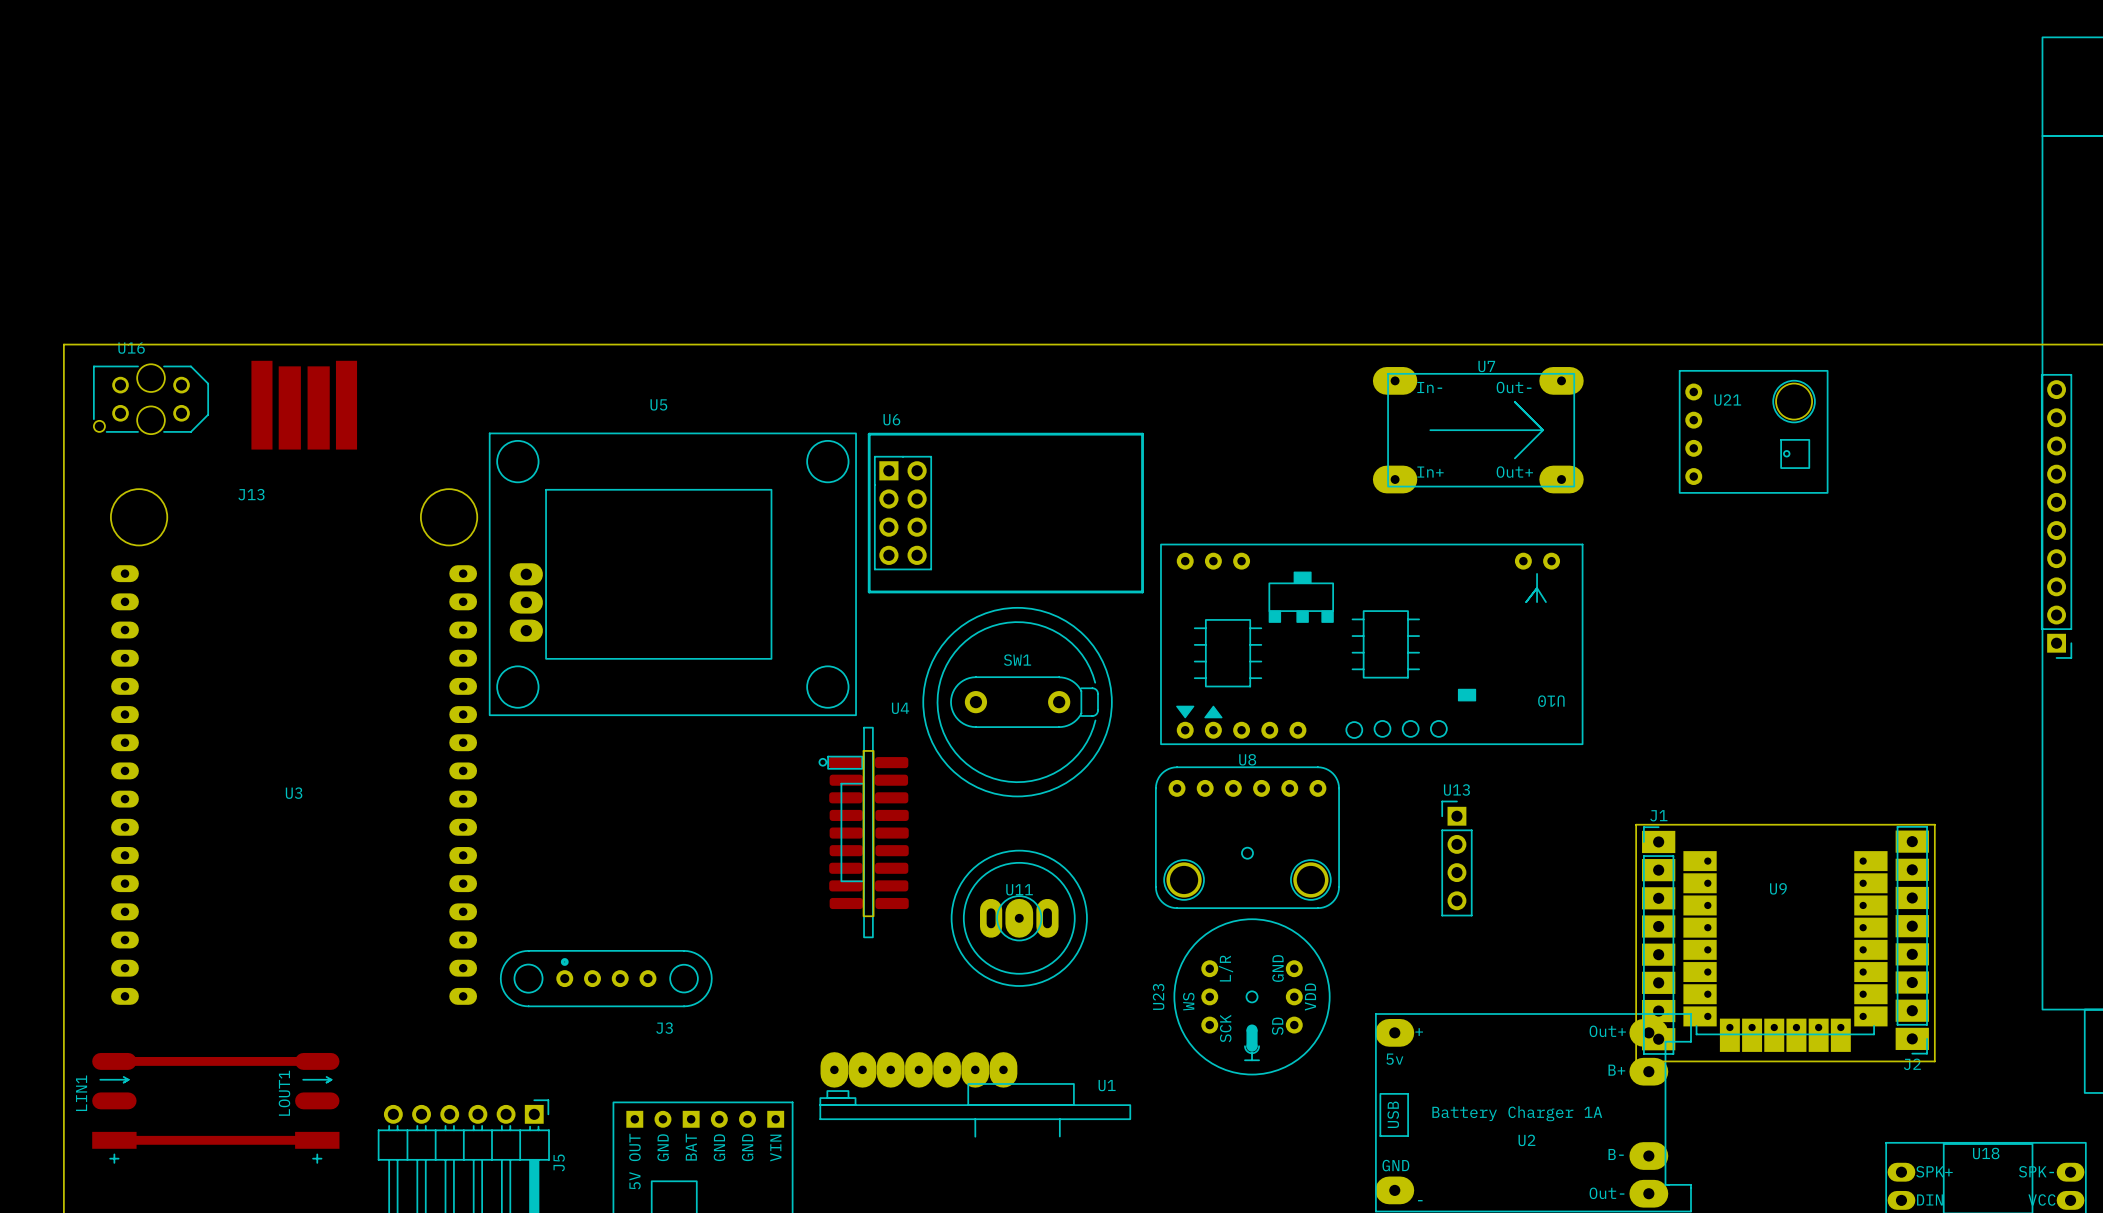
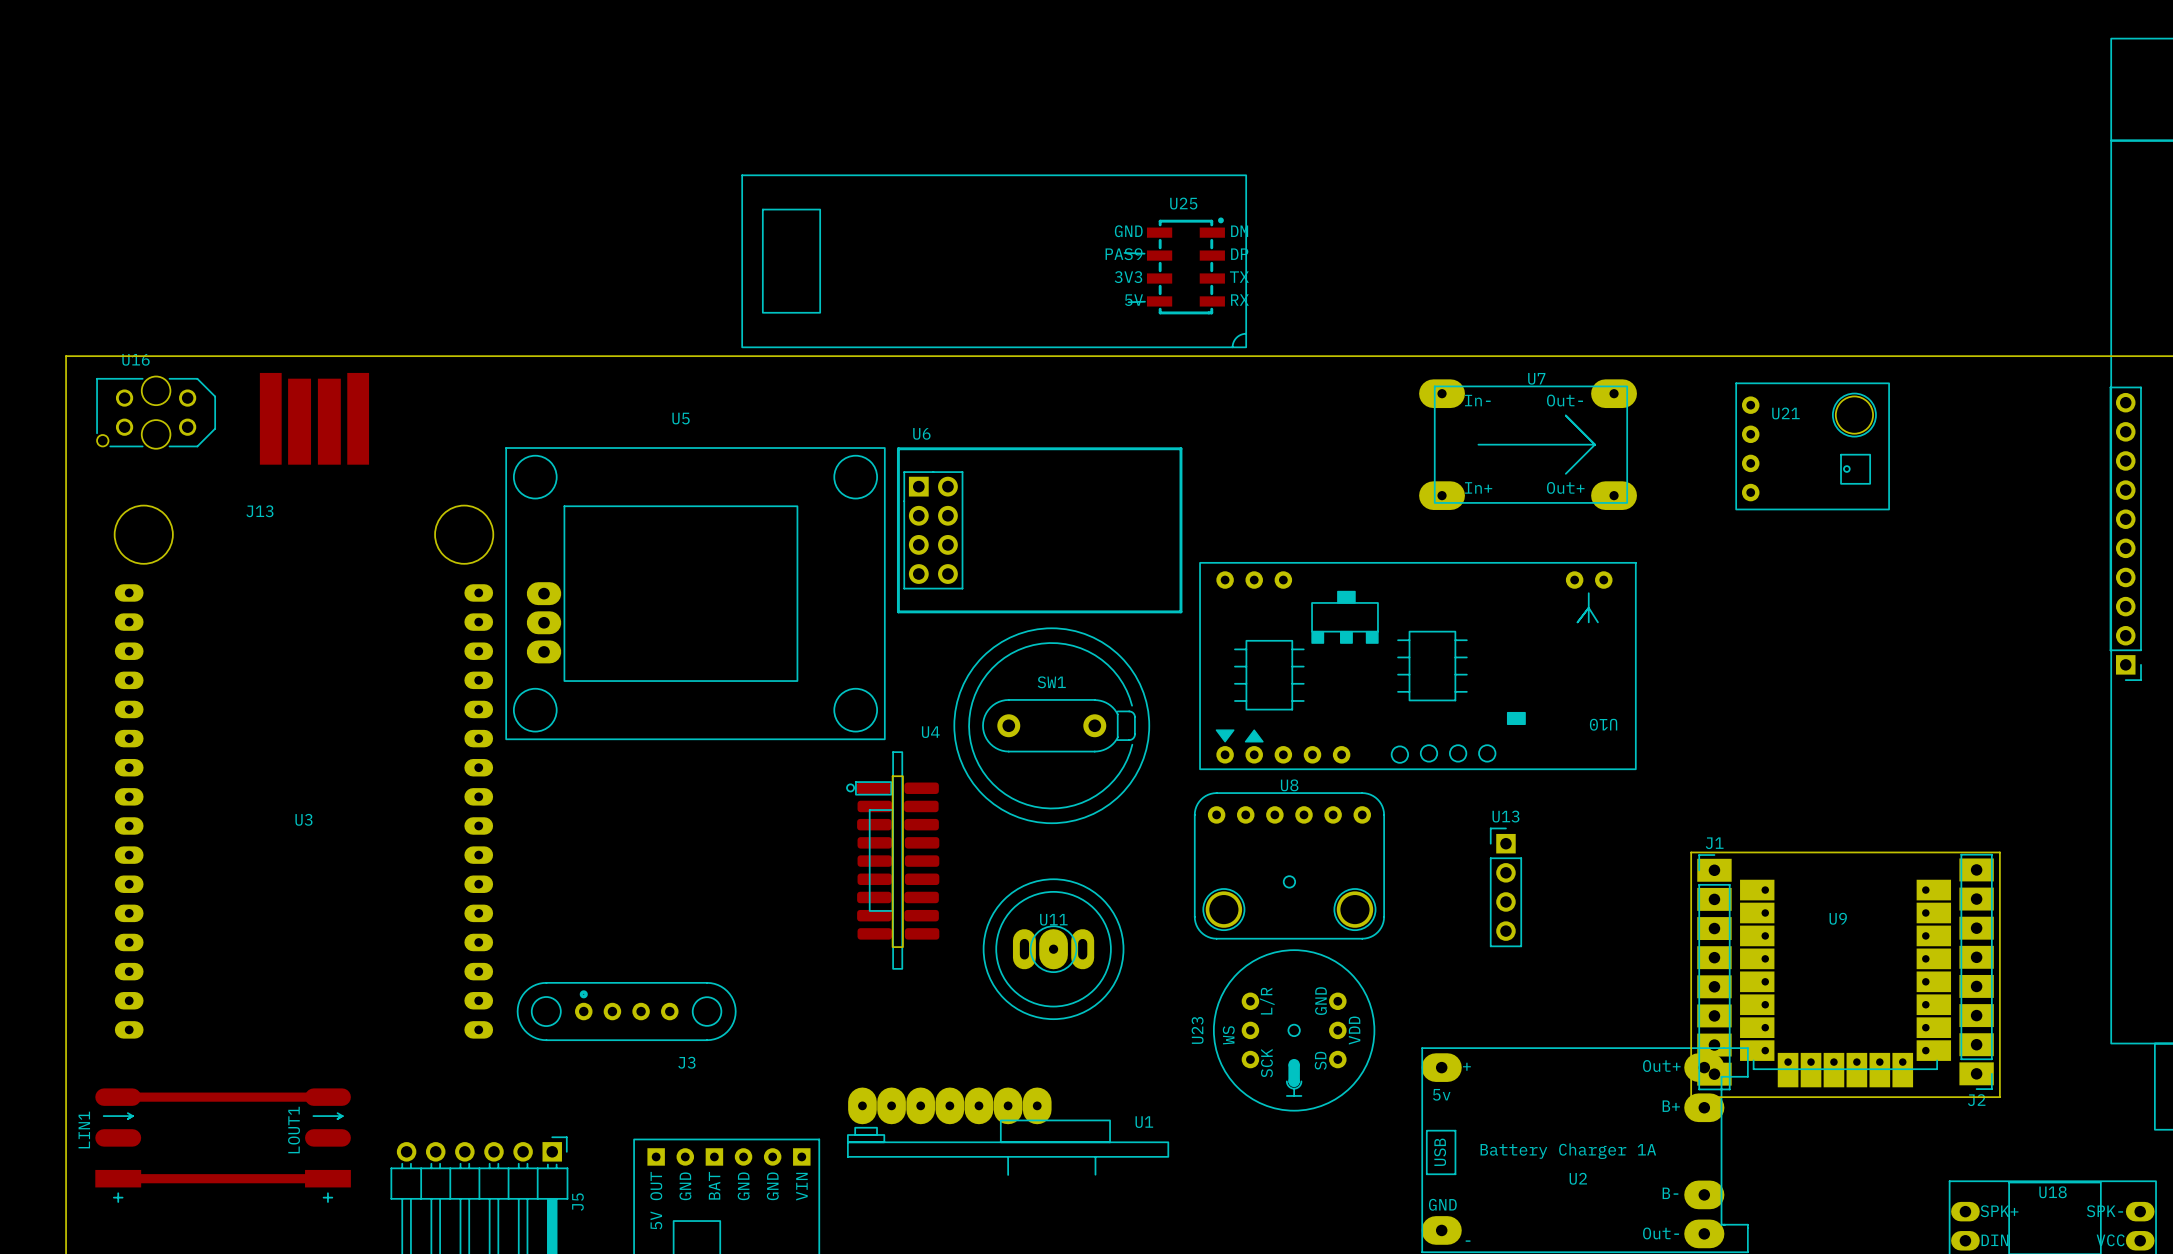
U25: none -> (994, 261)

